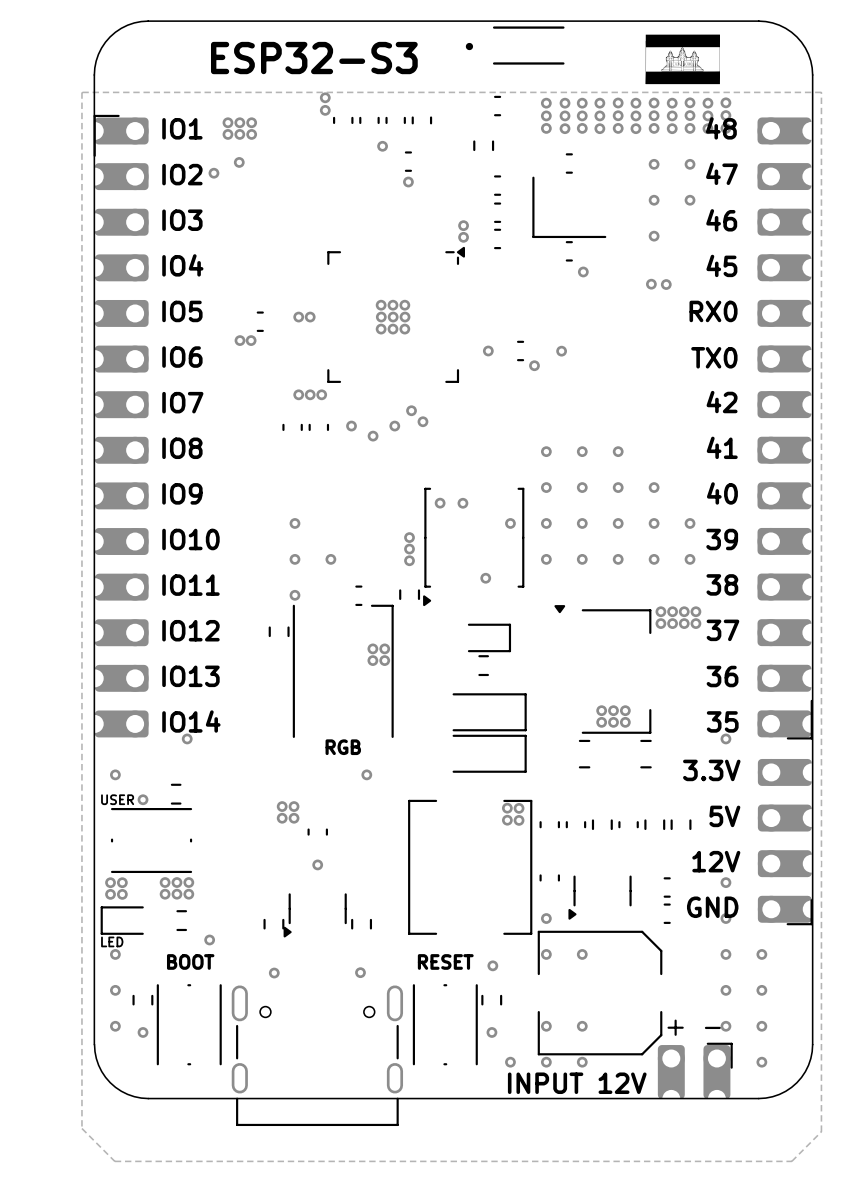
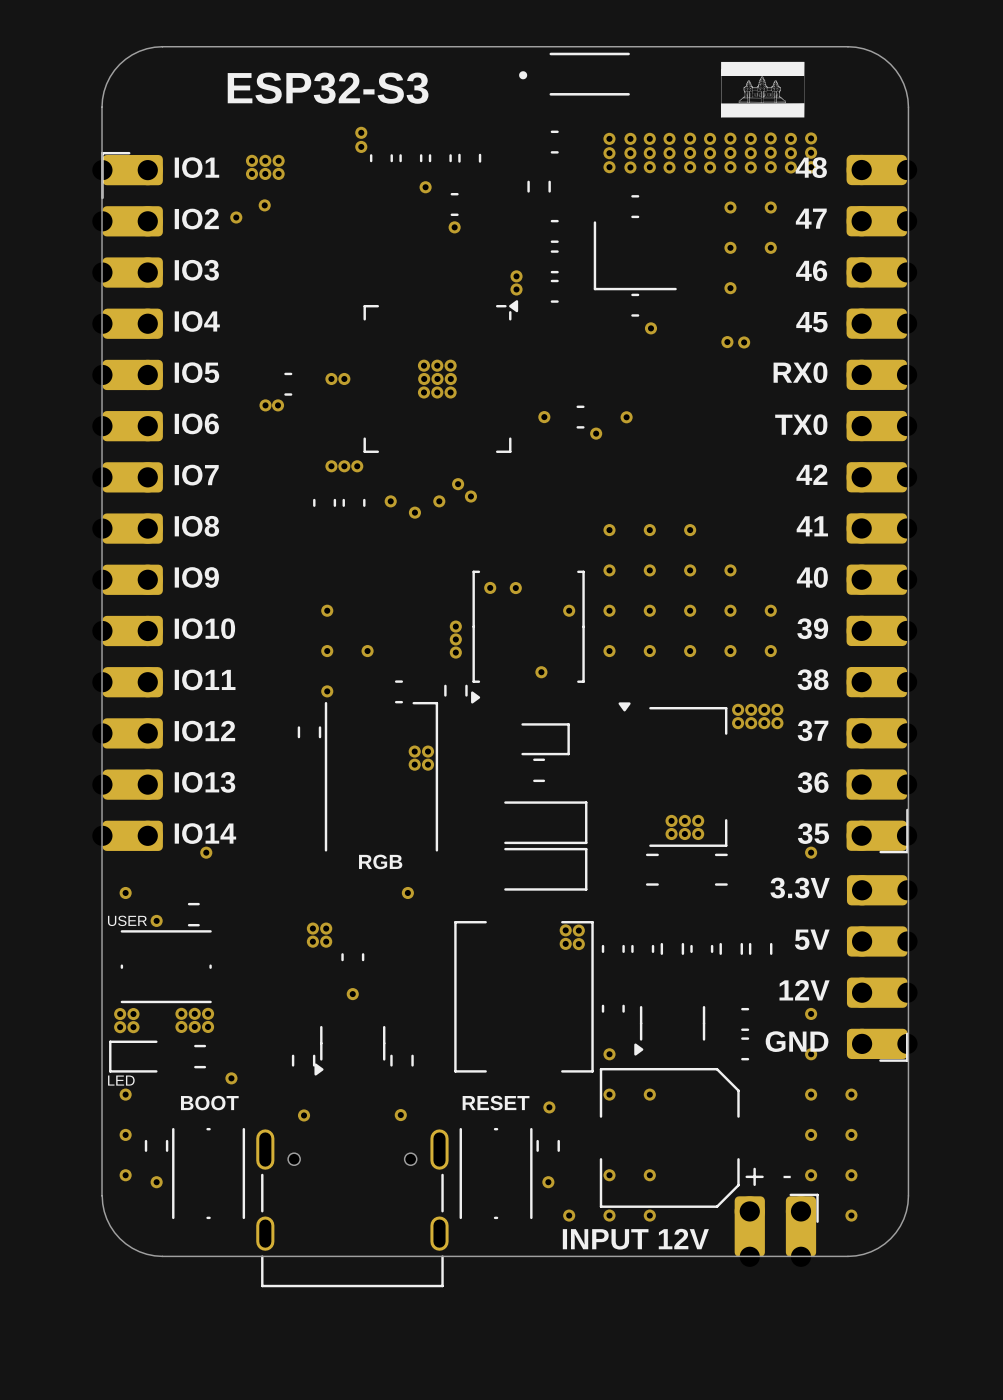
zone outline: (81, 92) (821, 92) (821, 1131) (791, 1161) (114, 1161) (81, 1128) (81, 92) -> none

